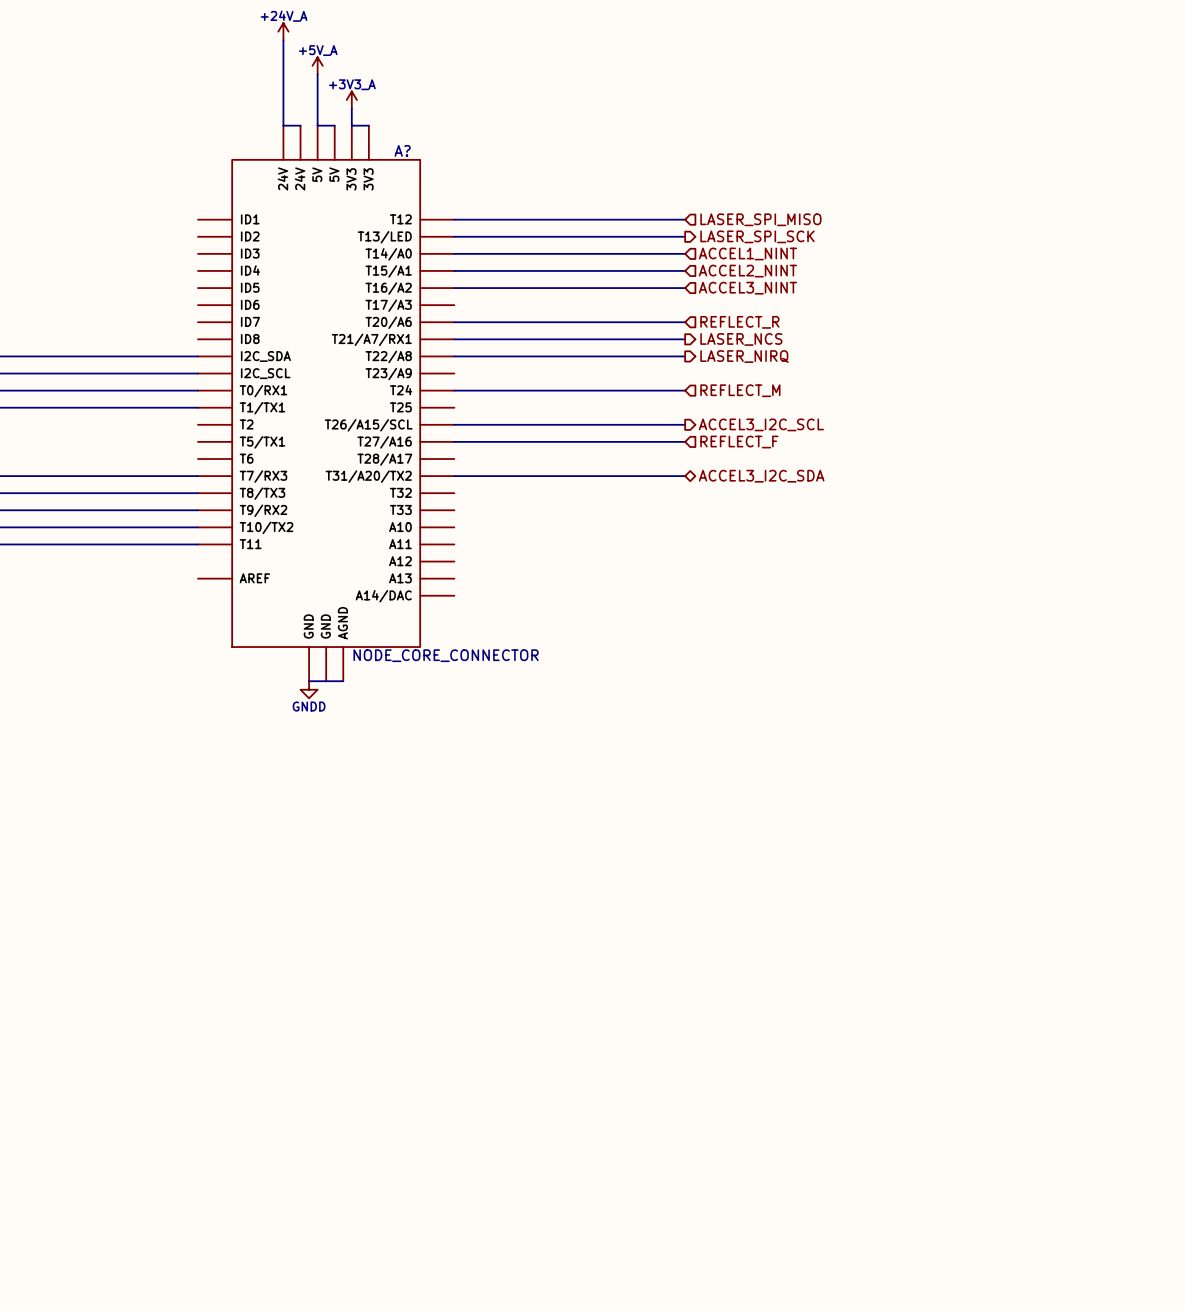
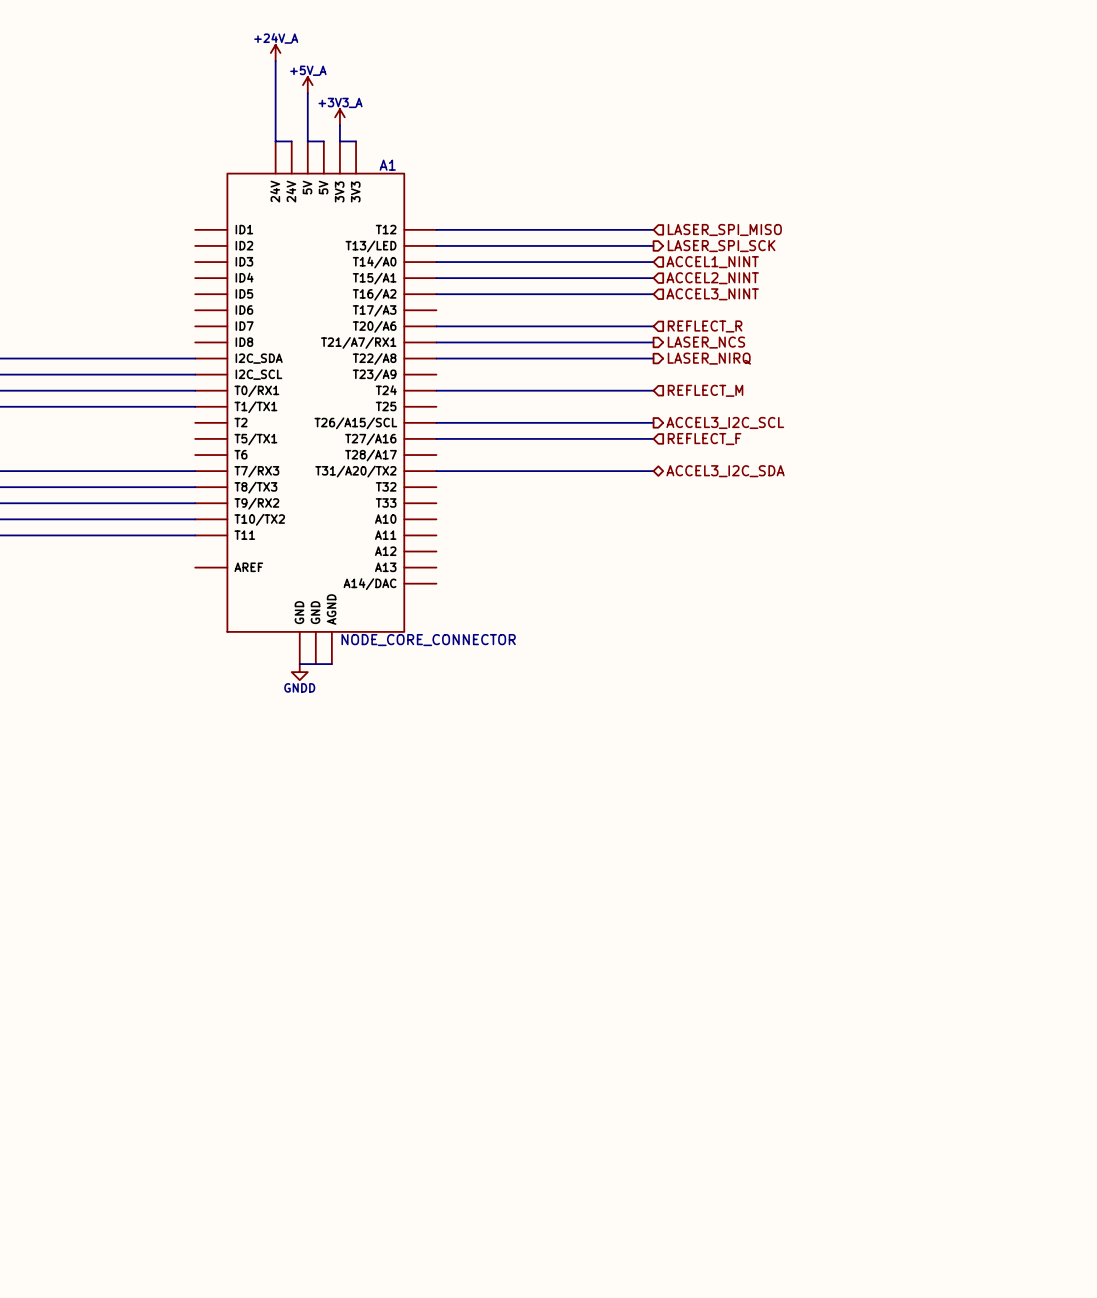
A? name: A? (402, 150) -> A1 (387, 165)

